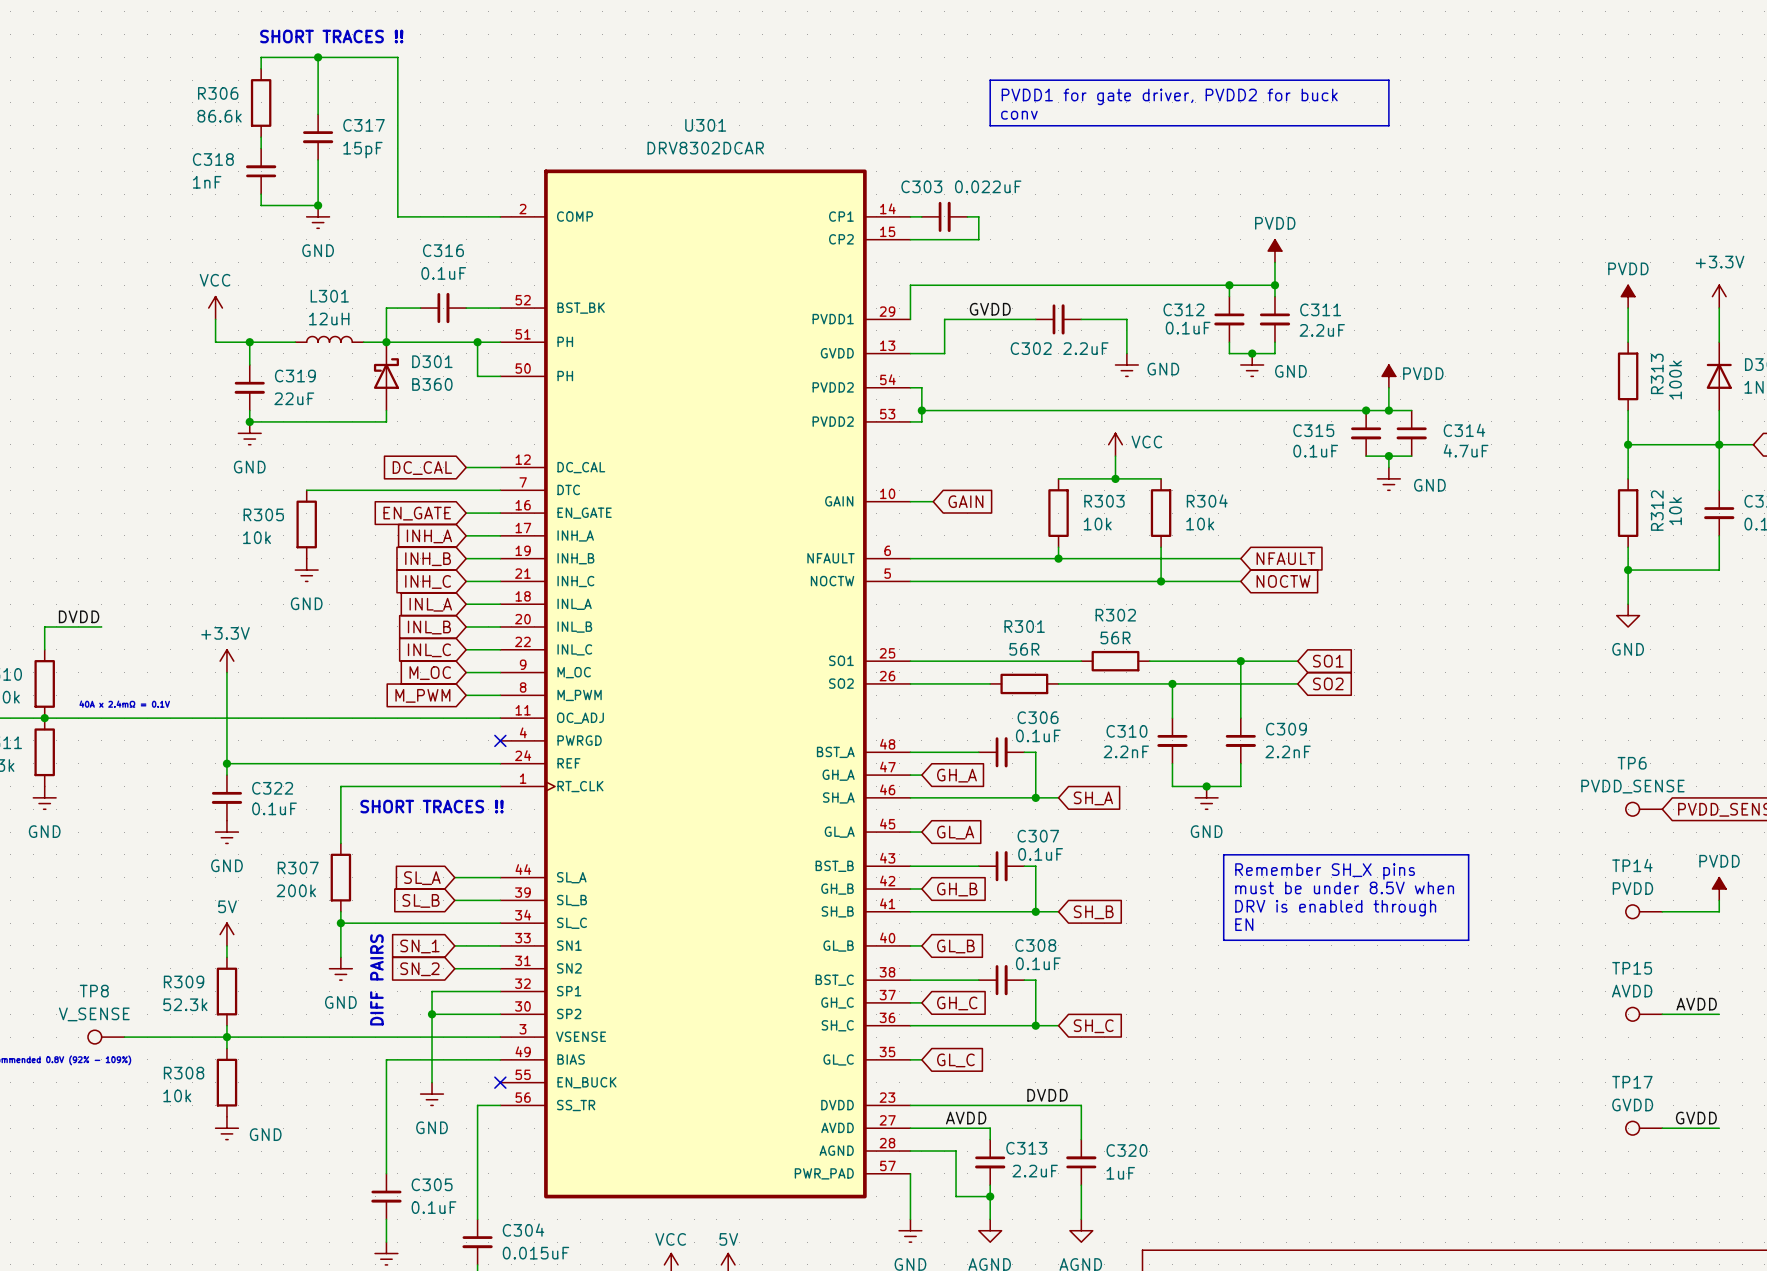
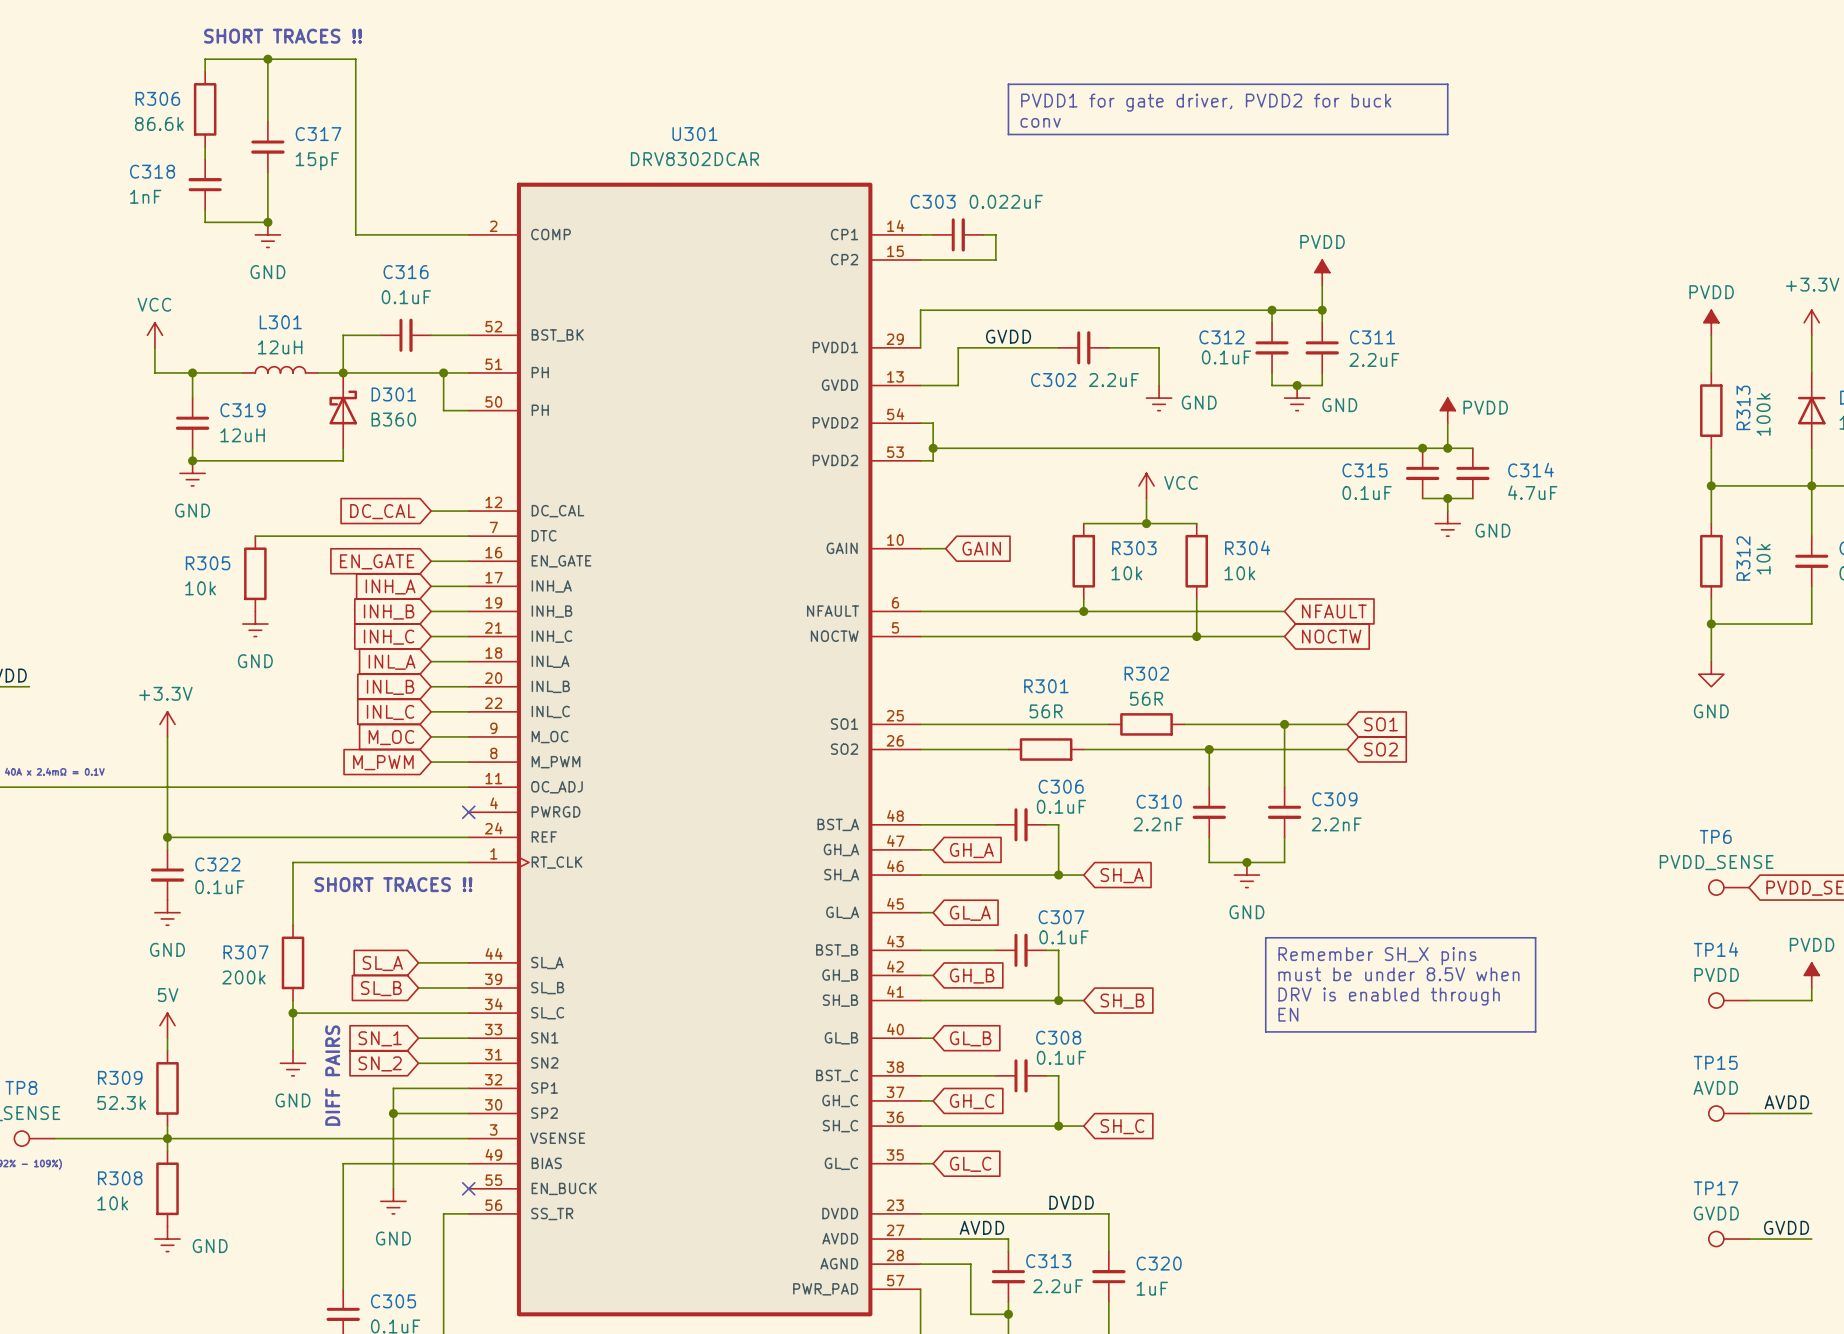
C319 value: 22uF (294, 398) -> 12uH (242, 435)

